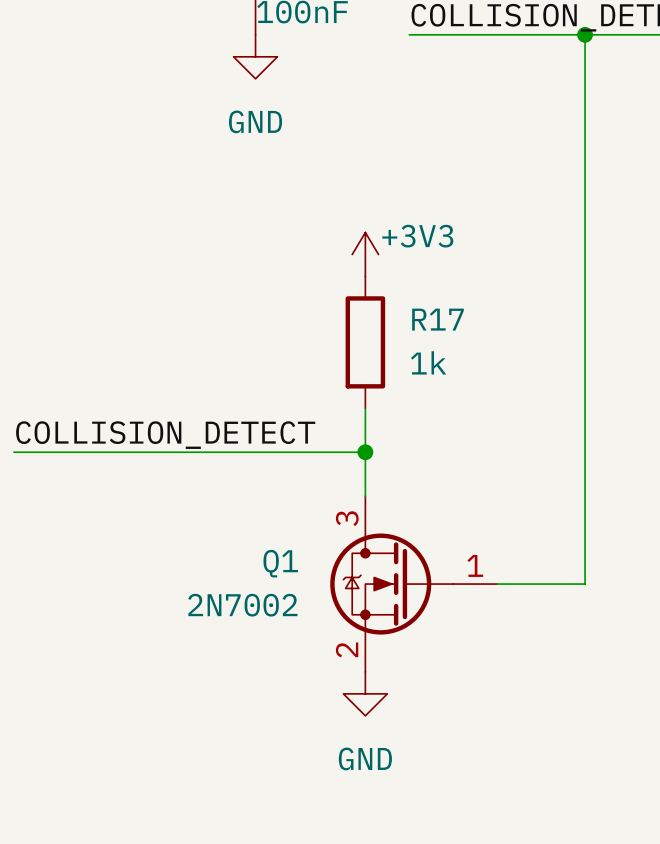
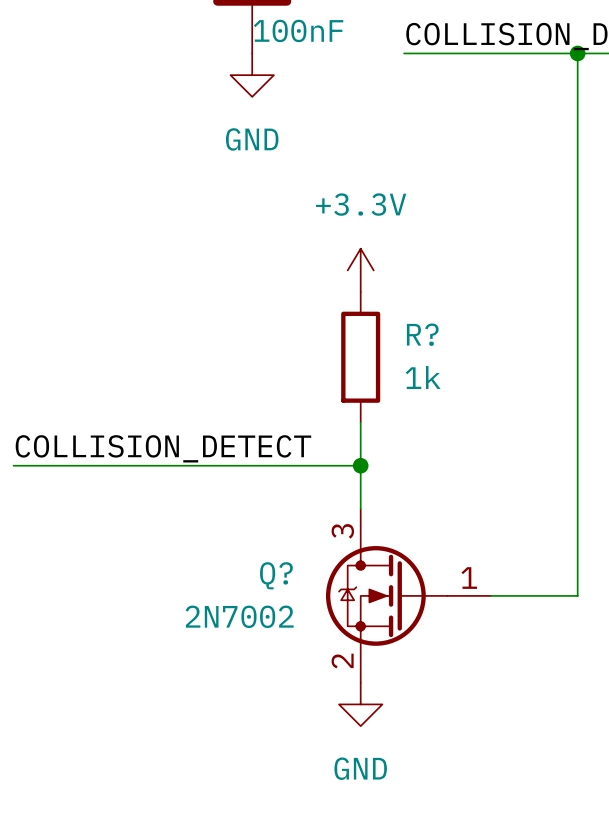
power symbol: +3V3 (365, 254) -> +3.3V (360, 270)
R17 name: R17 (437, 319) -> R? (422, 334)
Q1 name: Q1 (280, 563) -> Q? (276, 575)

